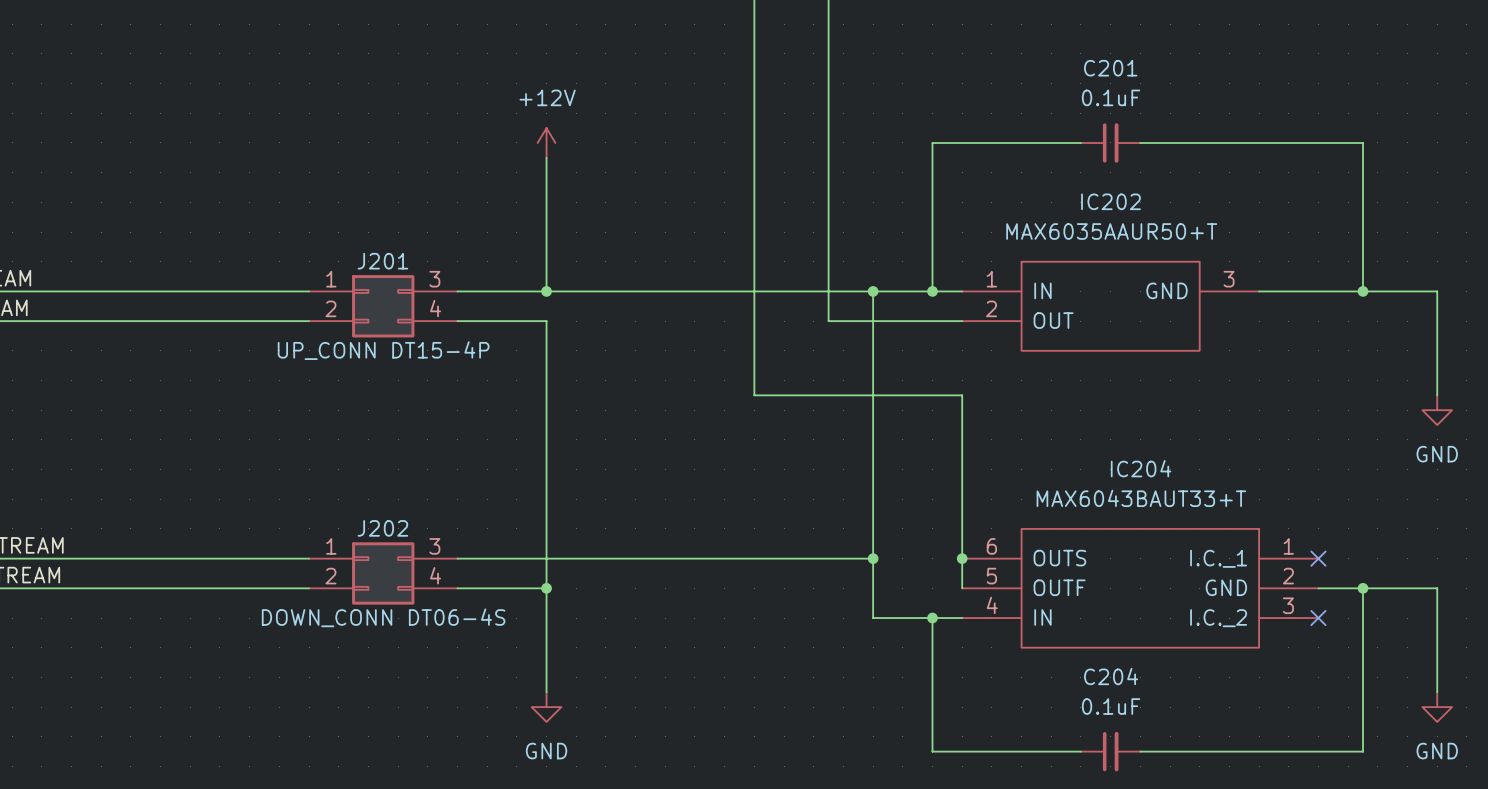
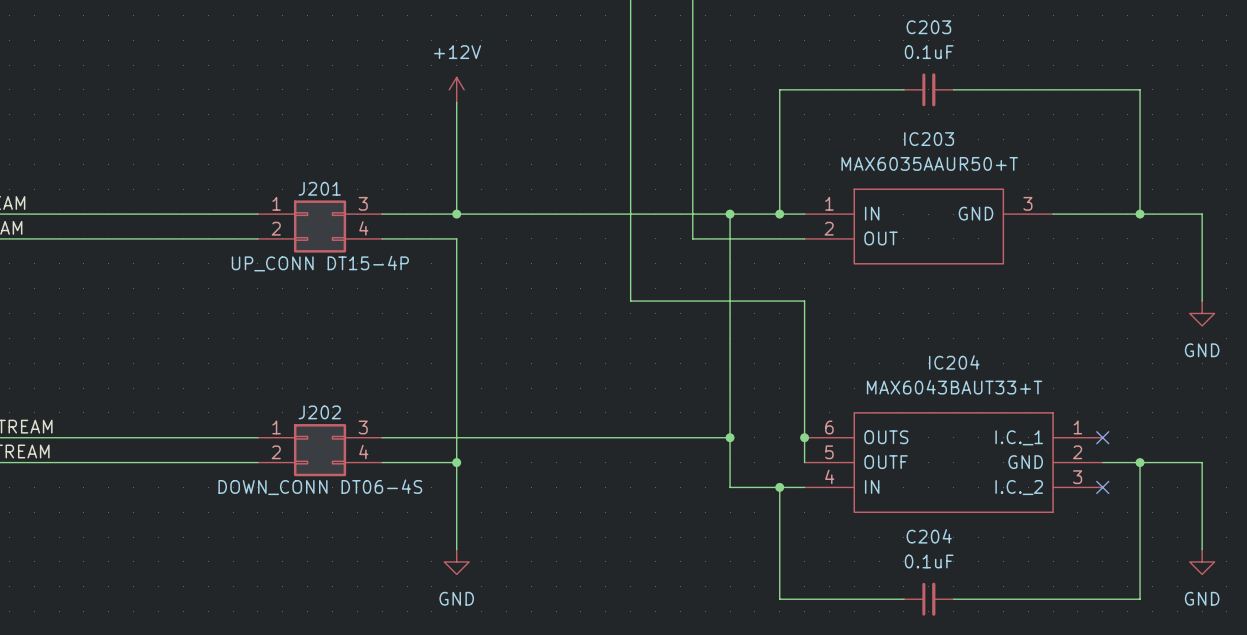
C201 name: C201 (1110, 68) -> C203 (928, 27)
IC202 name: IC202 (1110, 201) -> IC203 (929, 139)

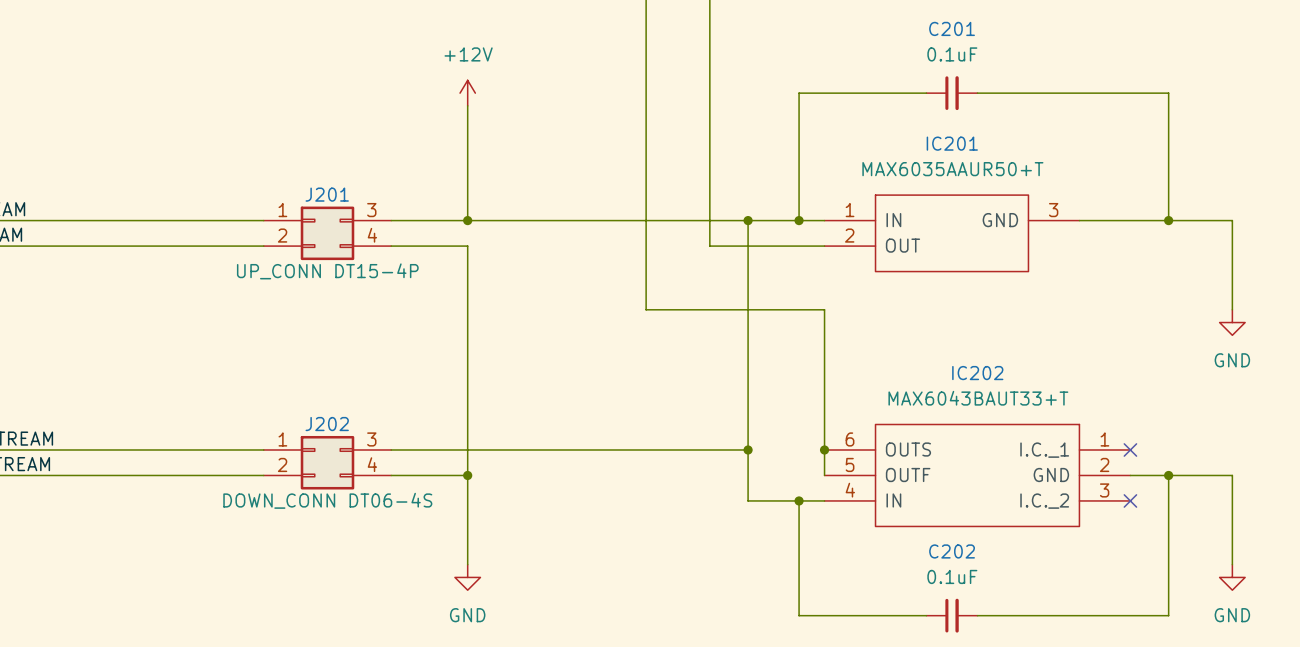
C203 name: C203 (928, 27) -> C201 (952, 28)
IC203 name: IC203 (929, 139) -> IC201 (952, 143)
IC204 name: IC204 (954, 362) -> IC202 (977, 373)
C204 name: C204 (929, 536) -> C202 (952, 551)

